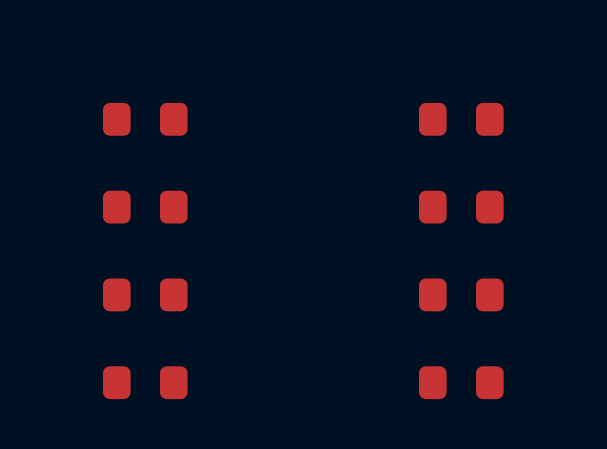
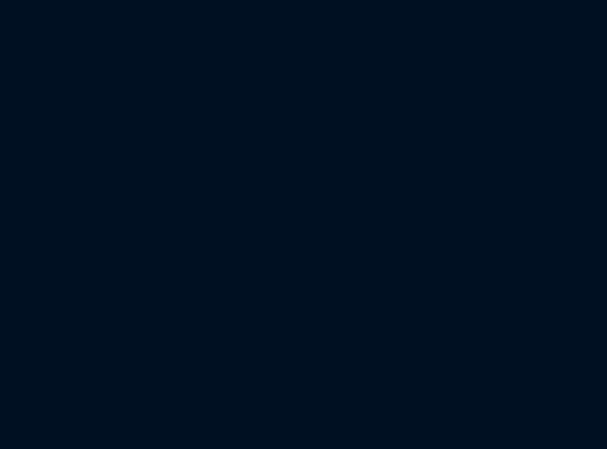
part: (145, 119) -> none
part: (461, 119) -> none
part: (145, 207) -> none
part: (461, 207) -> none
part: (145, 294) -> none
part: (461, 294) -> none
part: (145, 382) -> none
part: (461, 382) -> none

